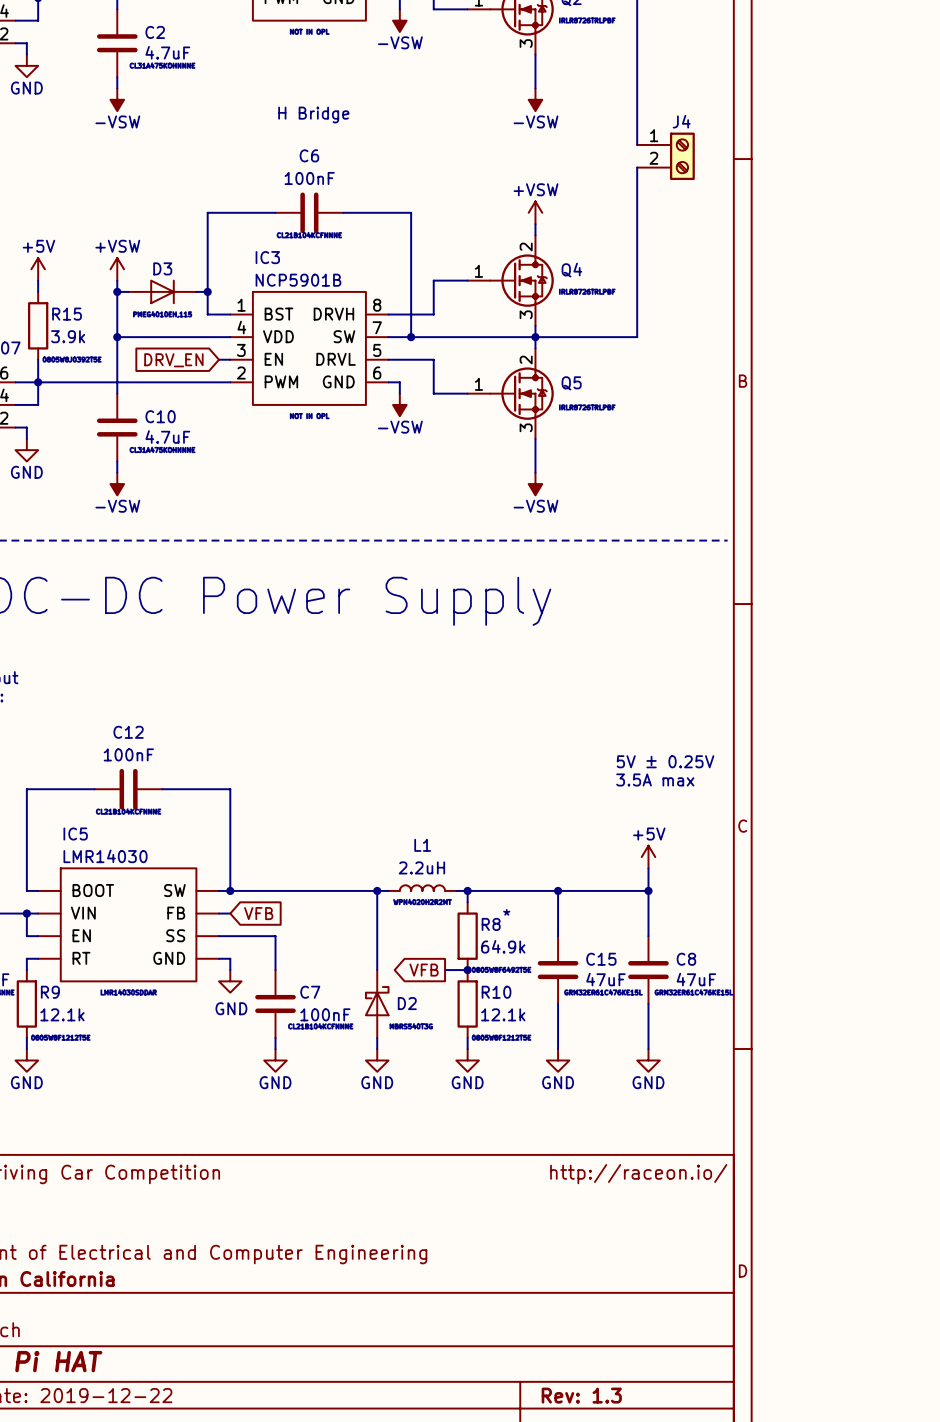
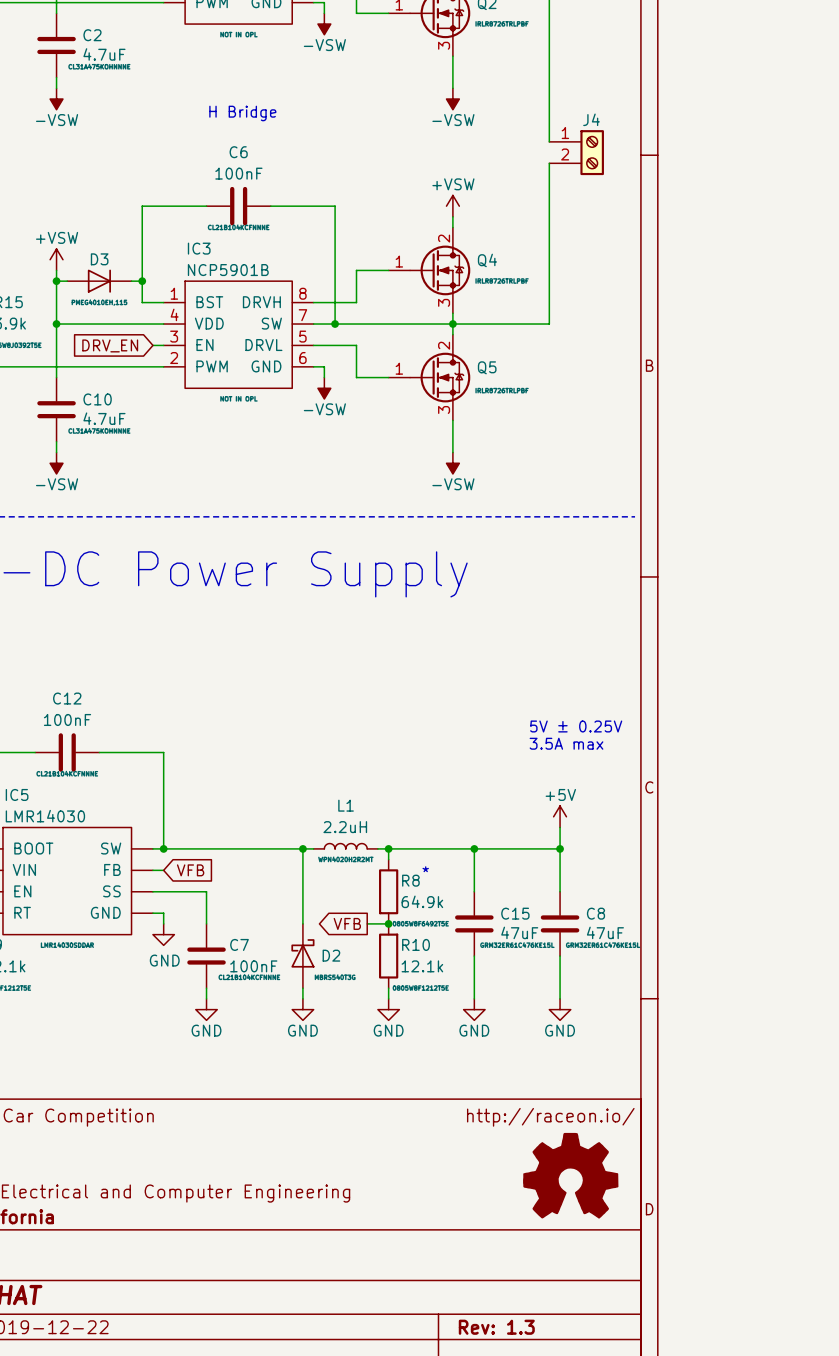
part: none -> (570, 1175)

